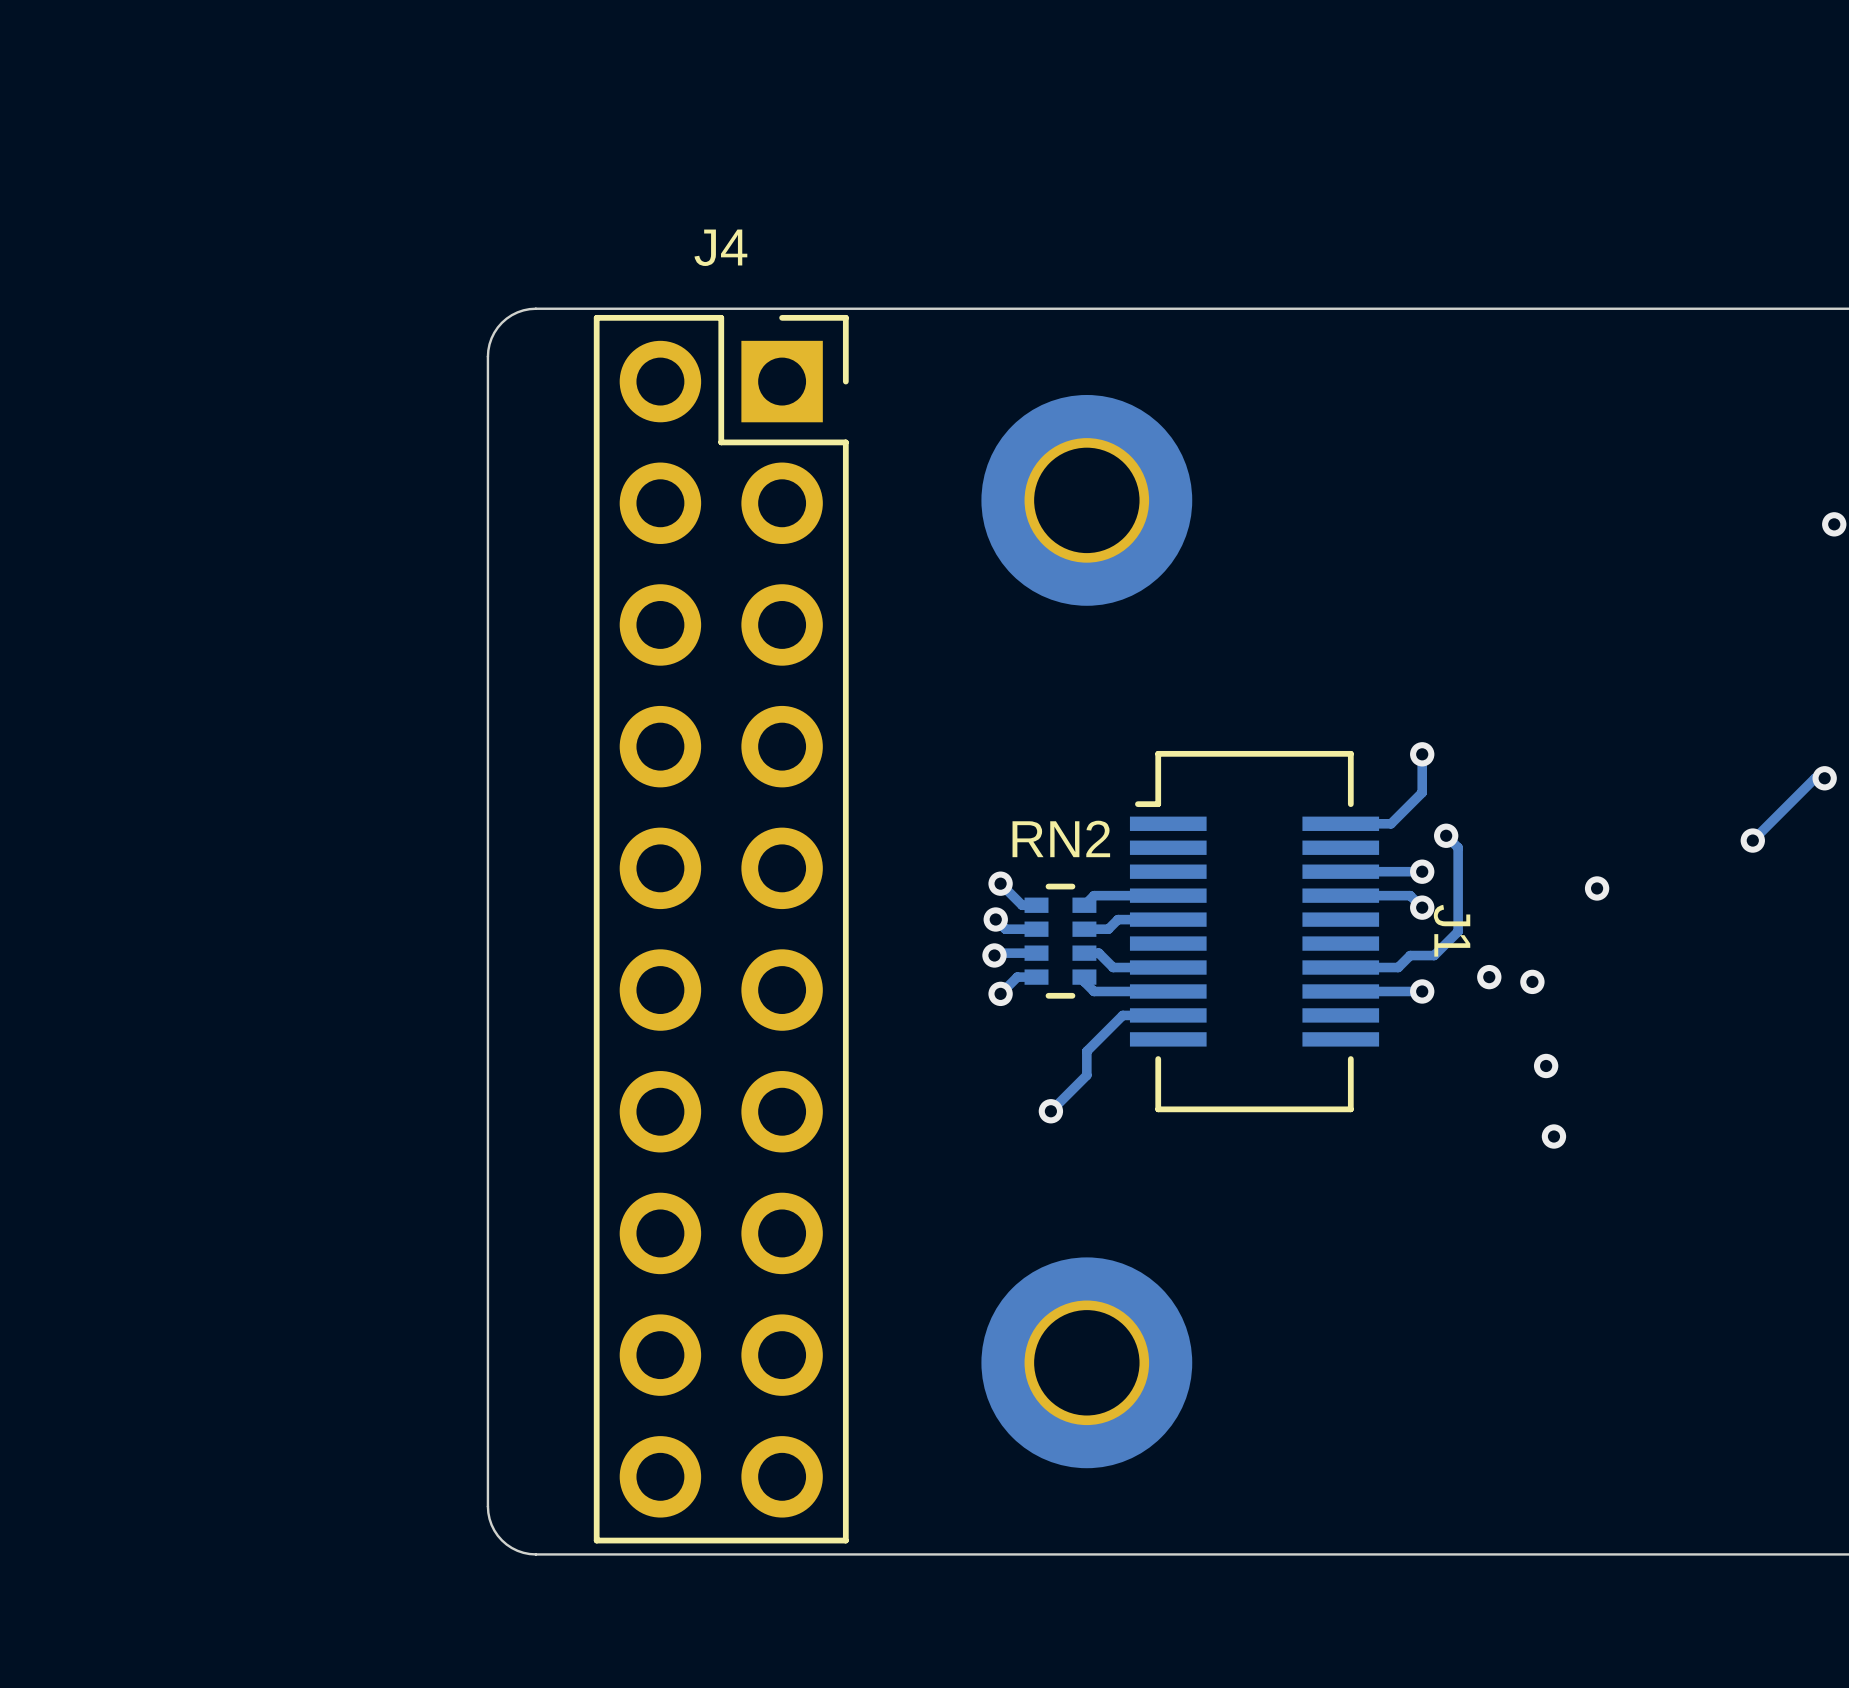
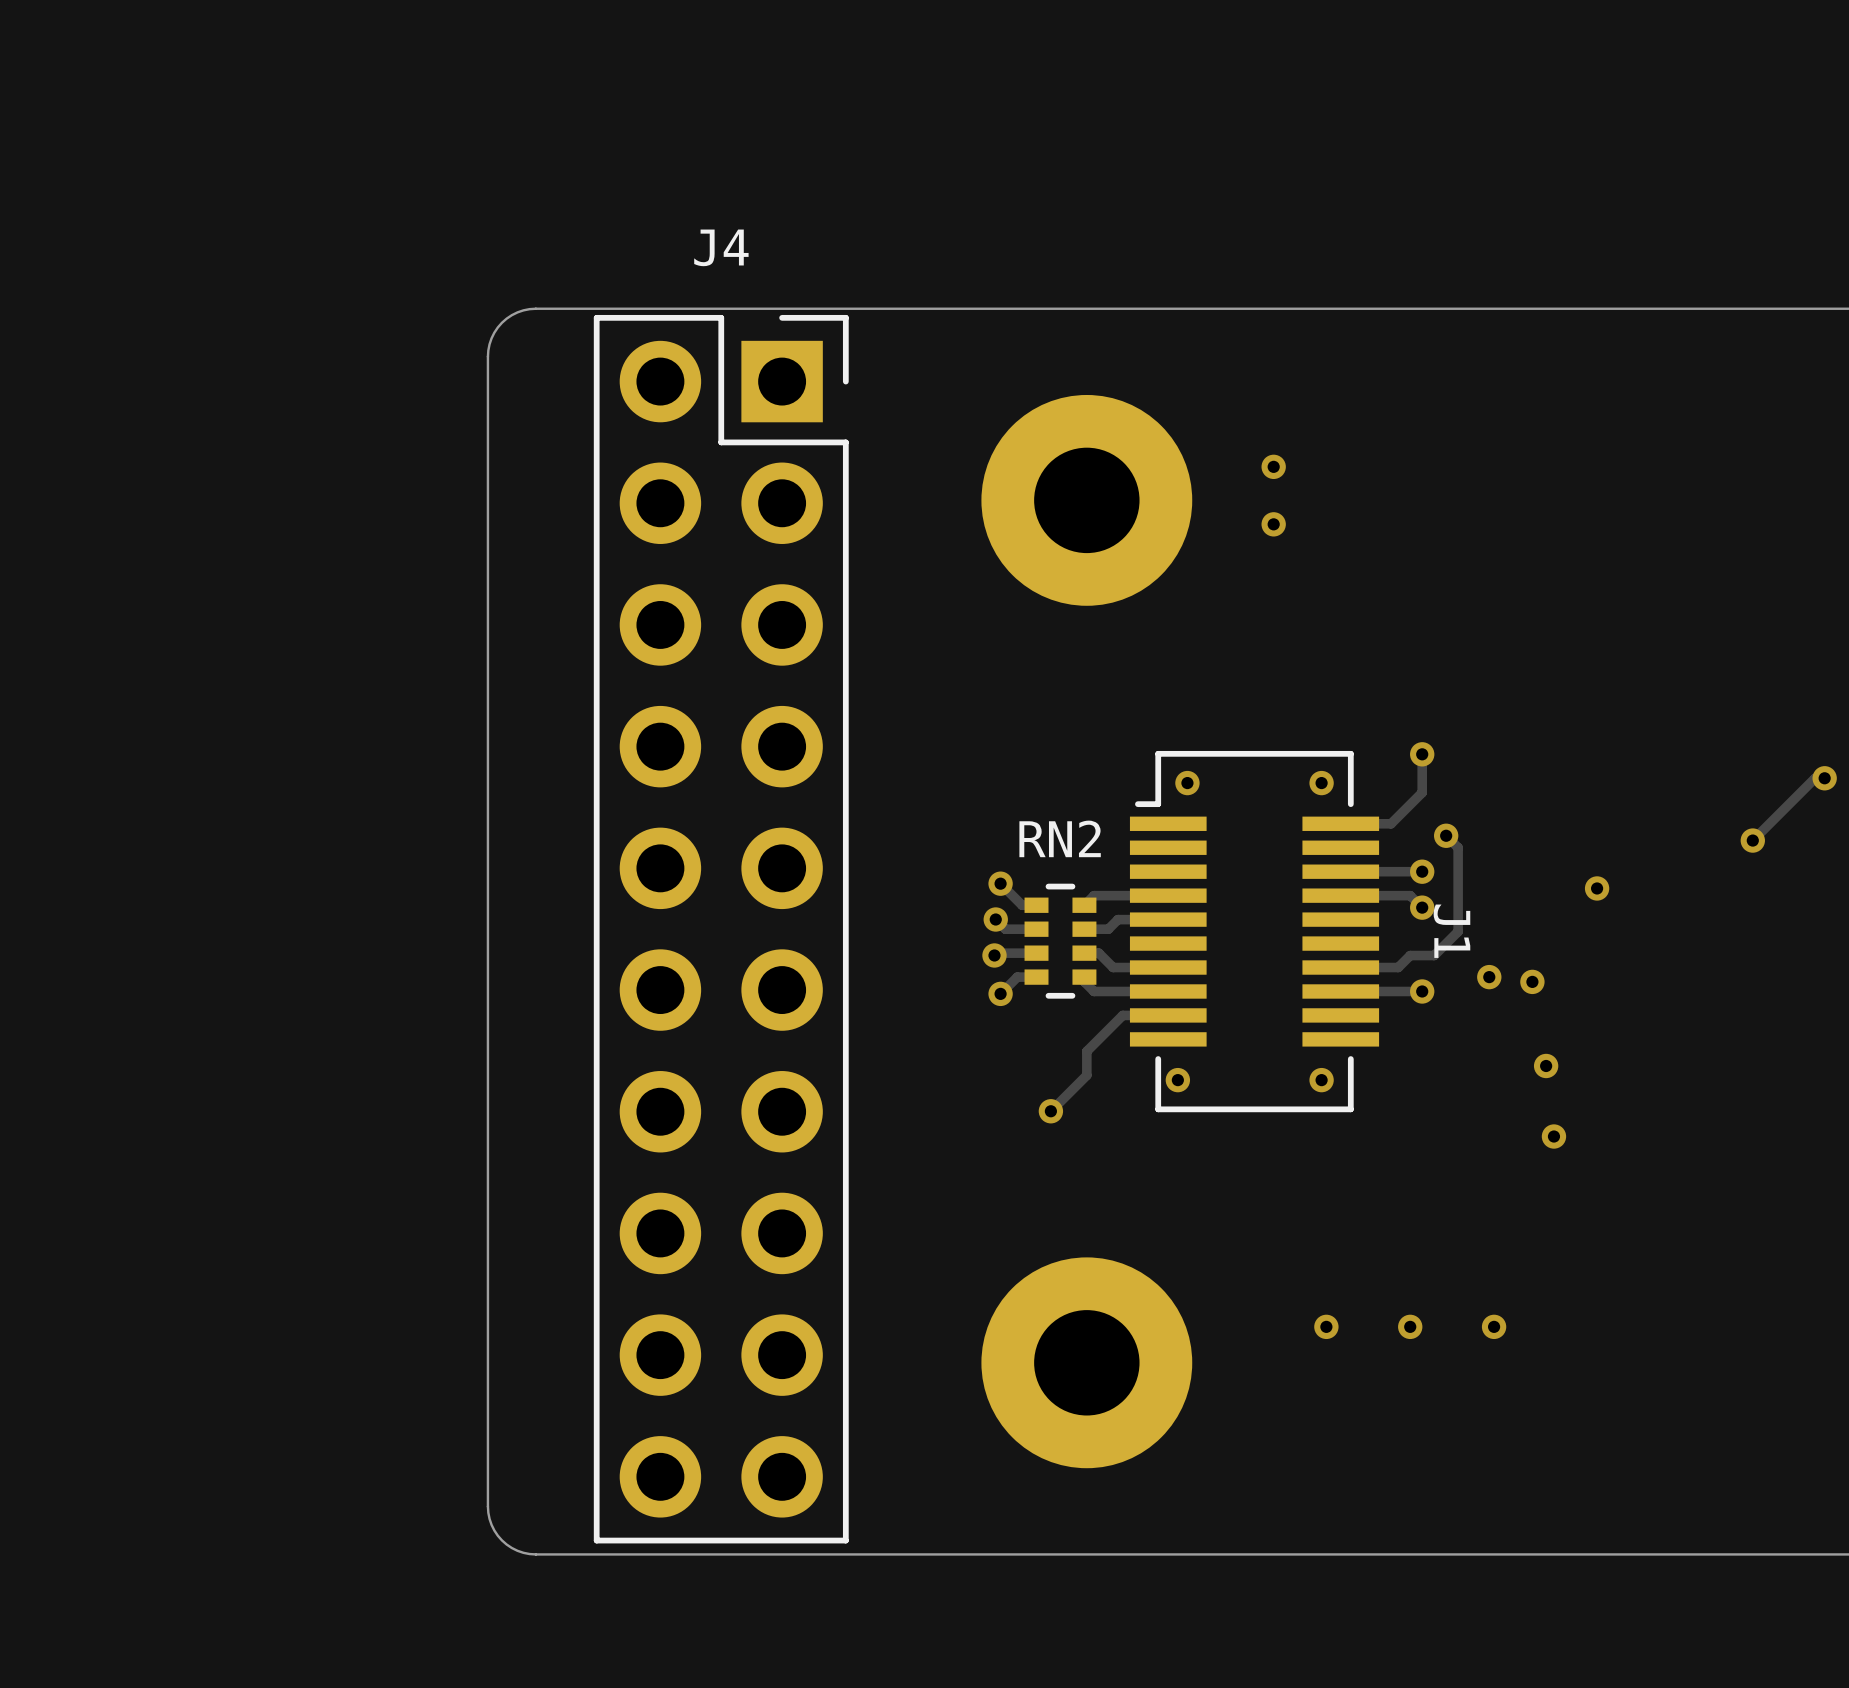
via: none -> (1273, 466)
via: none -> (1273, 524)
via: (1834, 524) -> none
via: none -> (1187, 783)
via: none -> (1321, 783)
via: none -> (1177, 1080)
via: none -> (1321, 1080)
via: none -> (1326, 1326)
via: none -> (1410, 1326)
via: none -> (1494, 1326)

